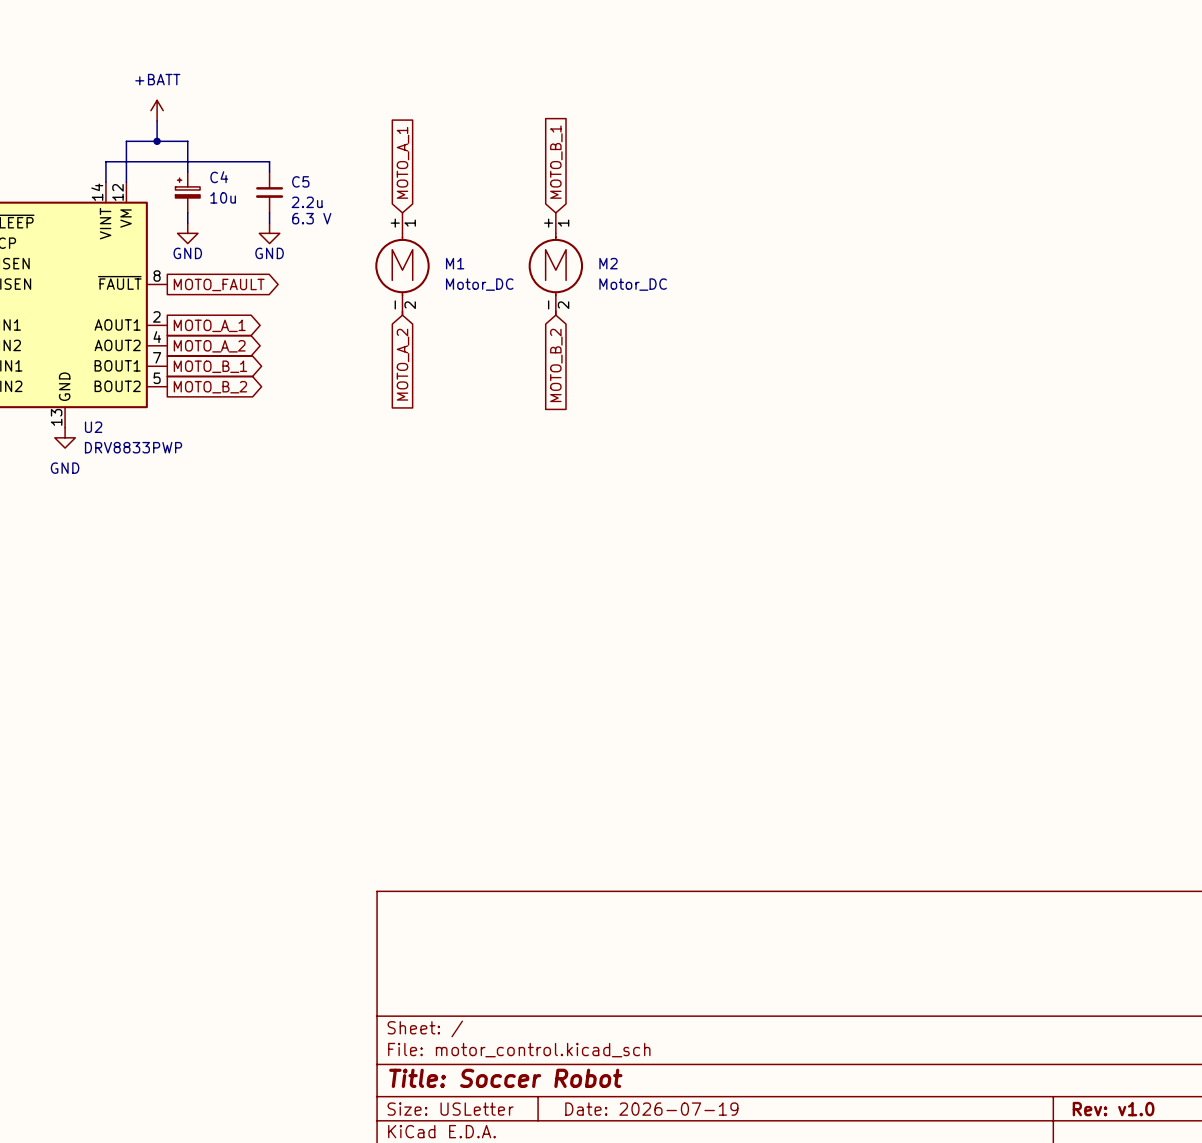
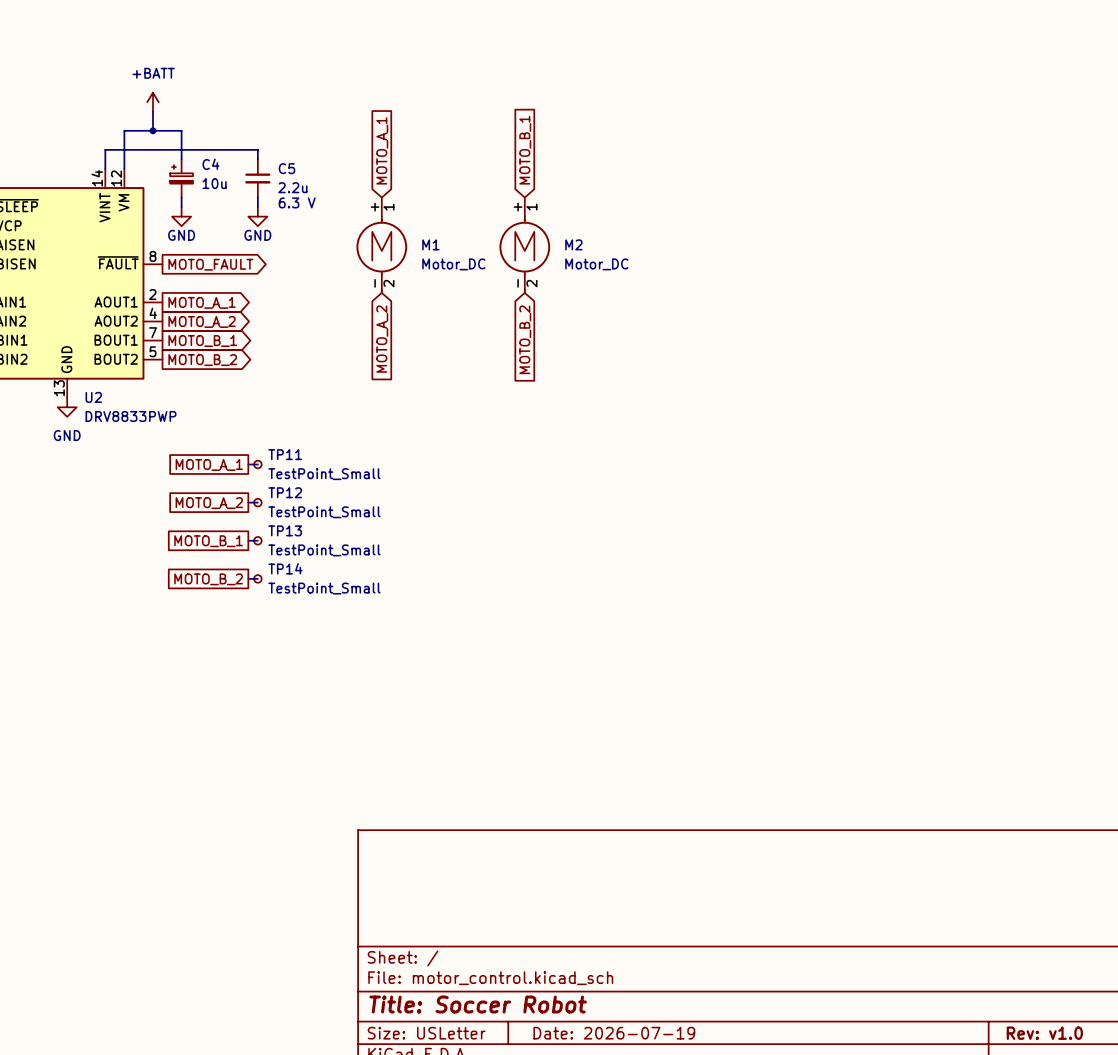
global label: none -> MOTO_A_1 (209, 464)
wire: none -> (248, 464) (257, 464)
TP11: none -> TestPoint_Small (257, 464)
global label: none -> MOTO_A_2 (209, 503)
wire: none -> (248, 502) (257, 502)
TP12: none -> TestPoint_Small (257, 502)
wire: none -> (248, 540) (257, 540)
TP13: none -> TestPoint_Small (257, 540)
global label: none -> MOTO_B_1 (208, 541)
wire: none -> (248, 578) (257, 578)
TP14: none -> TestPoint_Small (257, 578)
global label: none -> MOTO_B_2 (208, 579)

